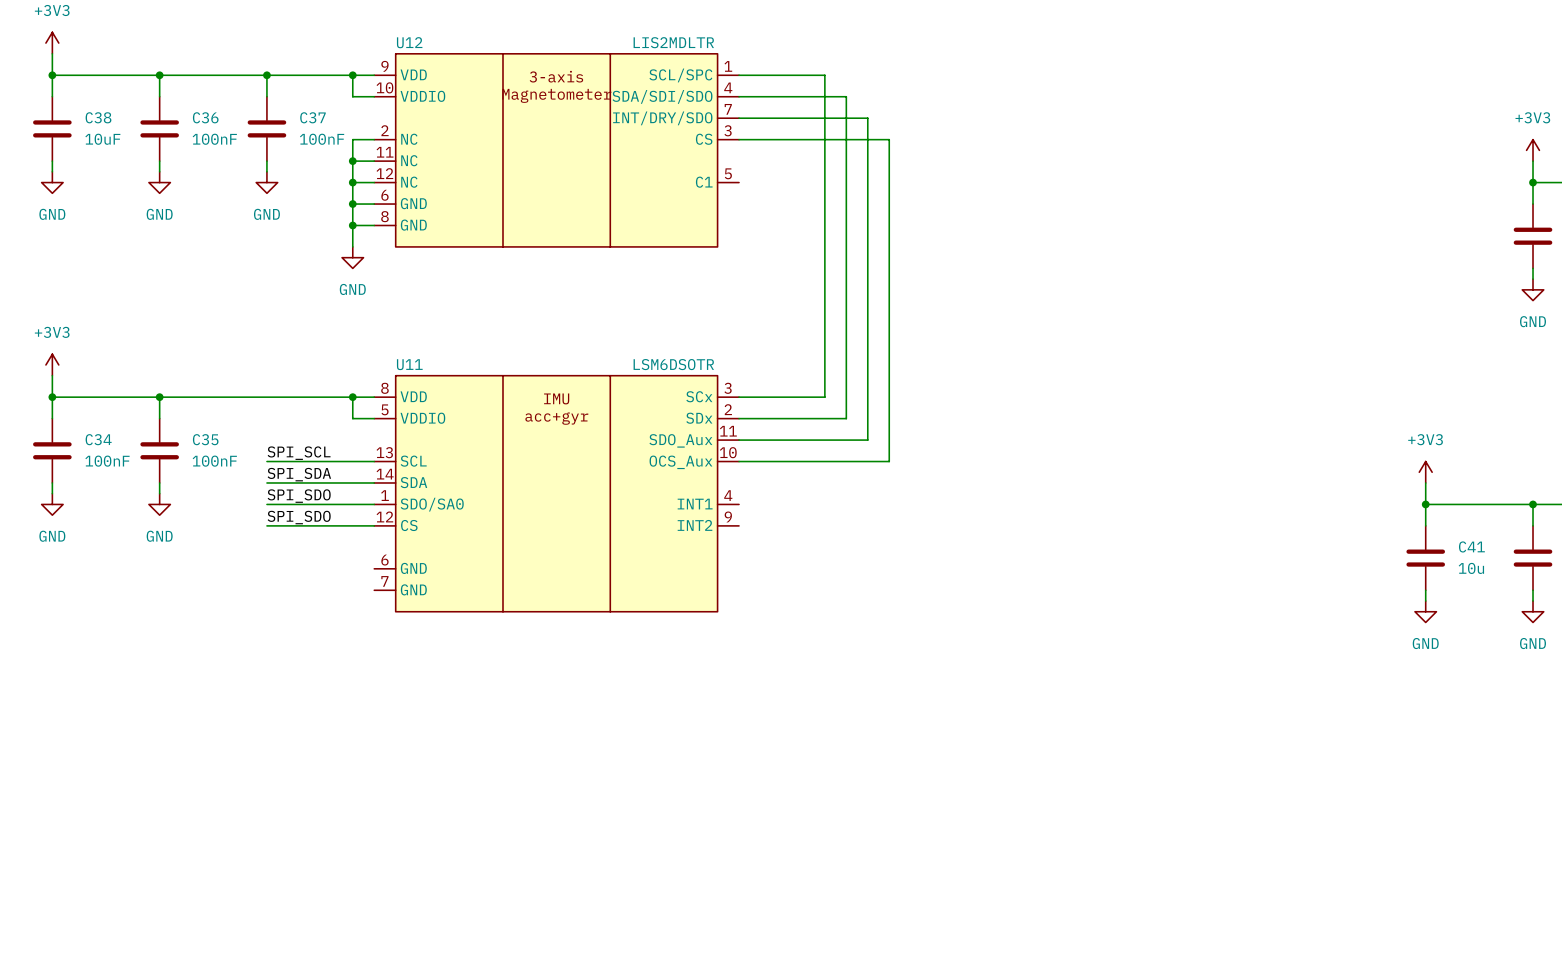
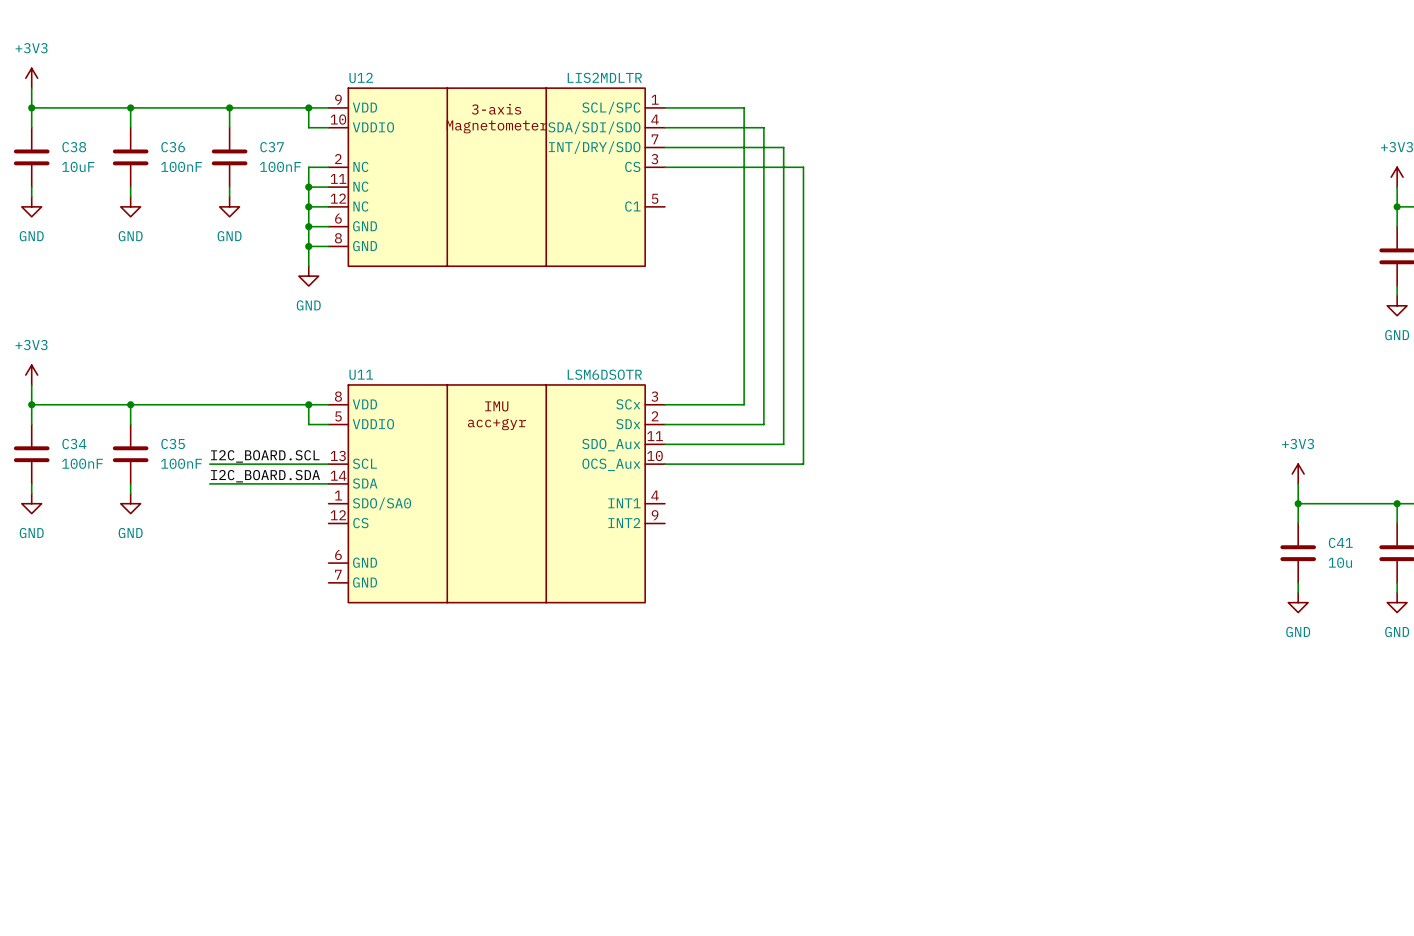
label: SPI_SCL (299, 453) -> none
label: none -> I2C_BOARD.SCL (265, 456)
wire: none -> (209, 464) (229, 464)
label: SPI_SDA (299, 474) -> none
label: none -> I2C_BOARD.SDA (265, 476)
wire: none -> (209, 483) (229, 483)
label: SPI_SDO (299, 496) -> none
wire: (266, 504) (374, 504) -> none
label: SPI_SDO (299, 517) -> none
wire: (266, 525) (374, 525) -> none

